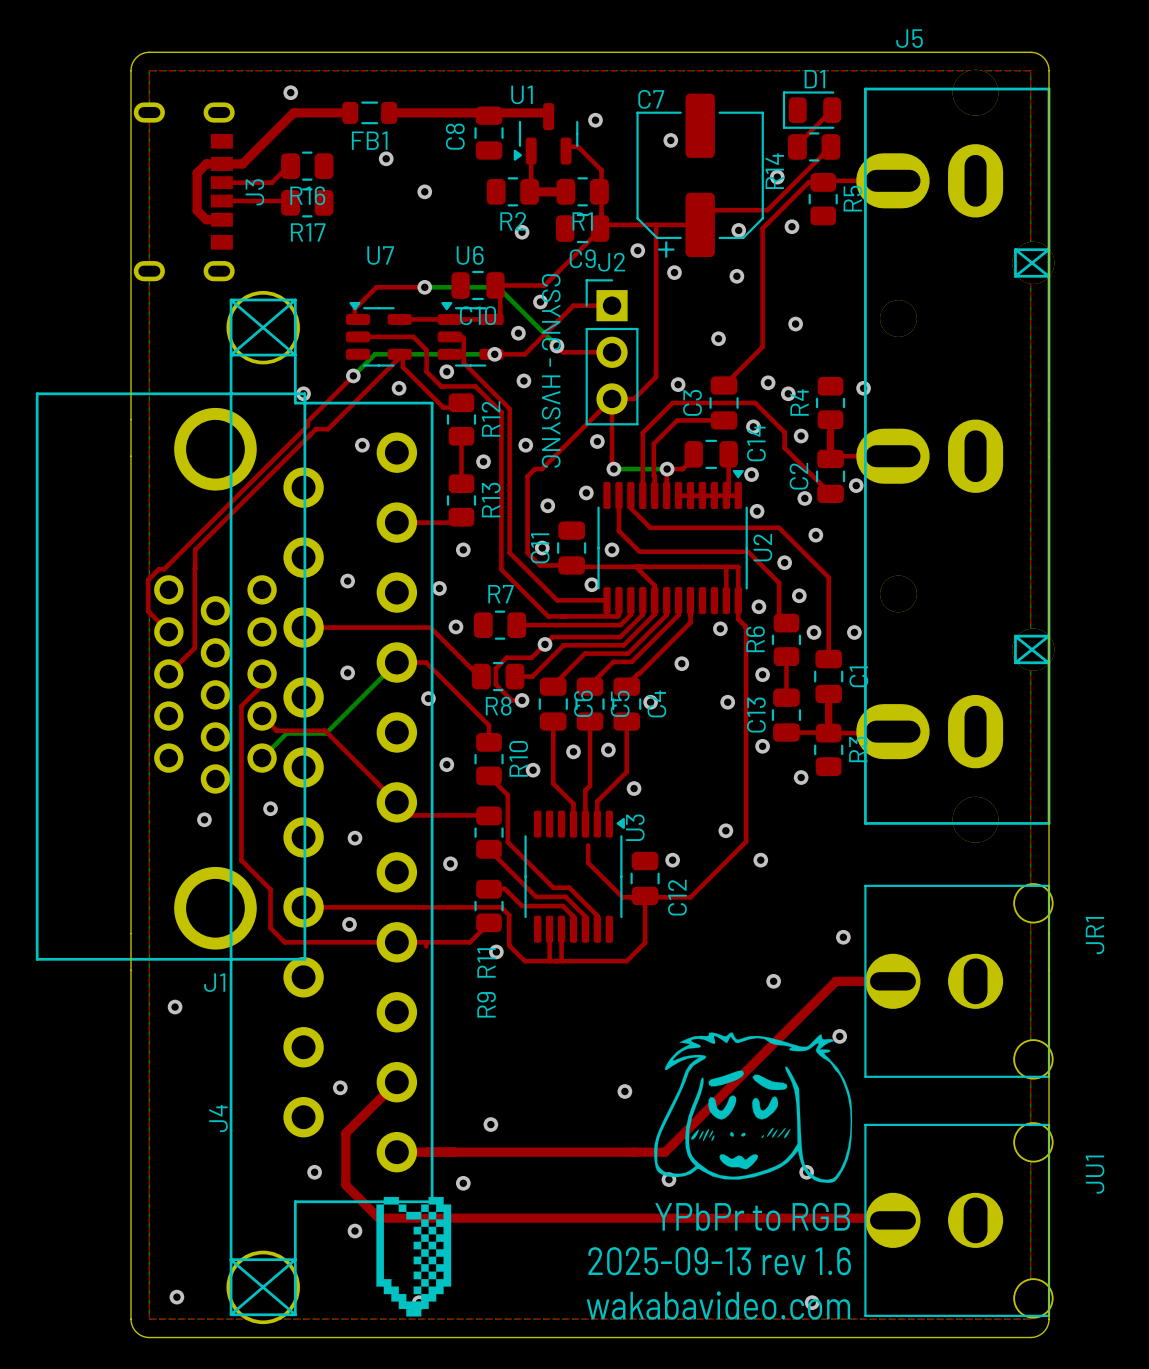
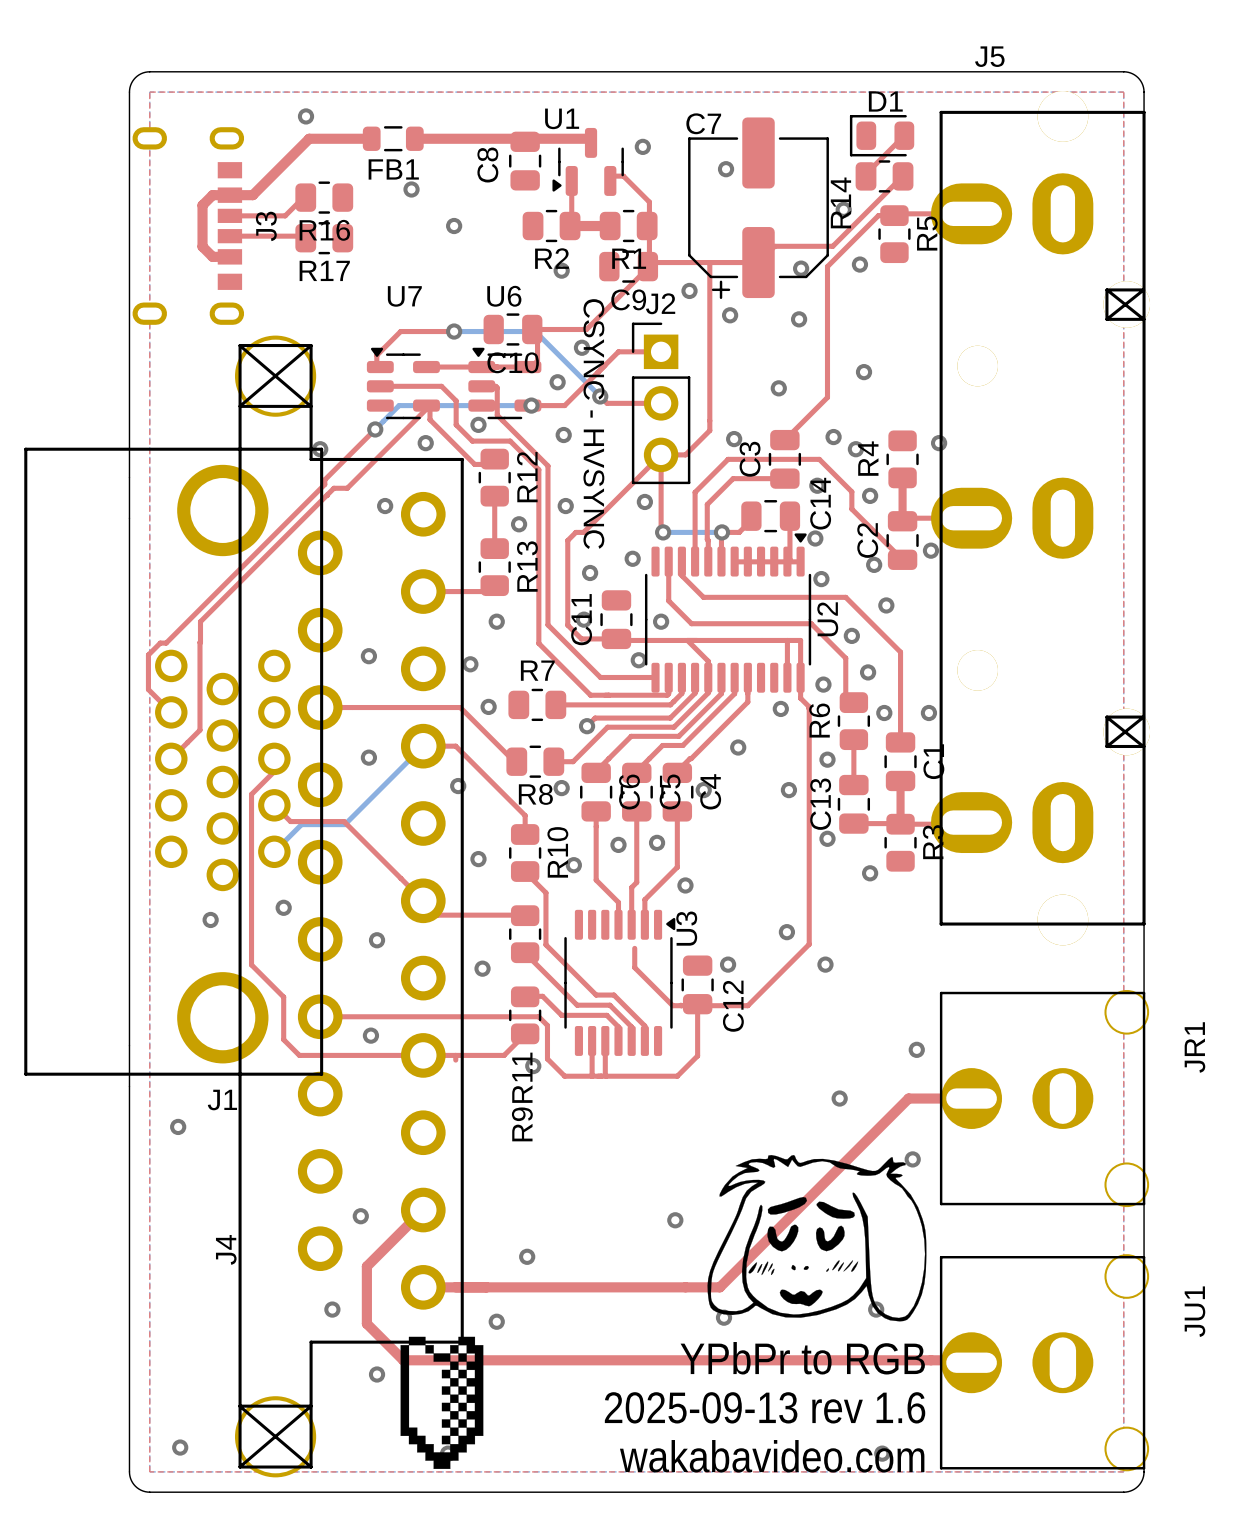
top track: (545, 644) (531, 657) (506, 657) (495, 668) (495, 684) (511, 700) (522, 700) -> none

